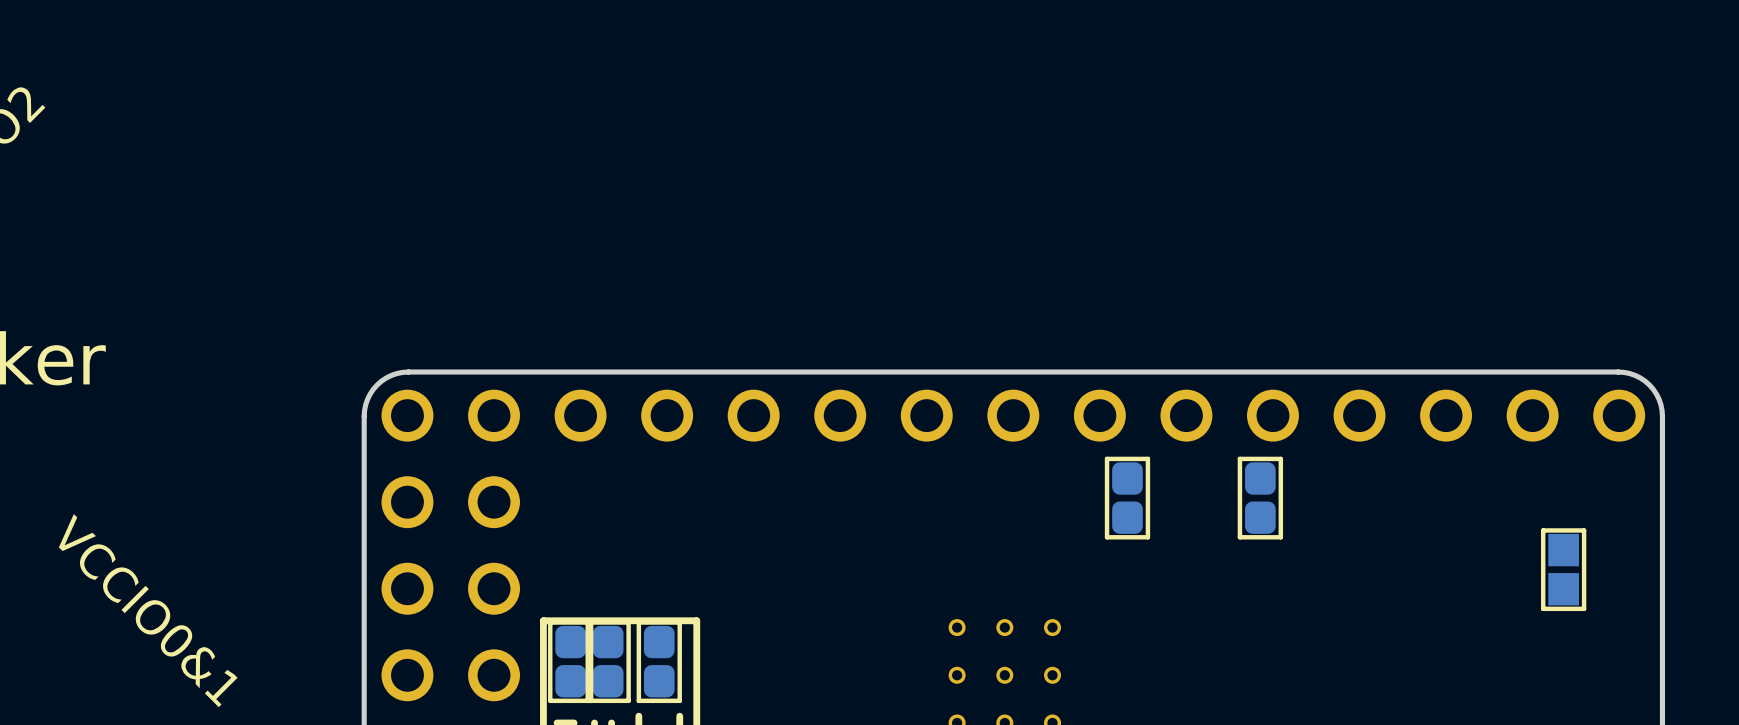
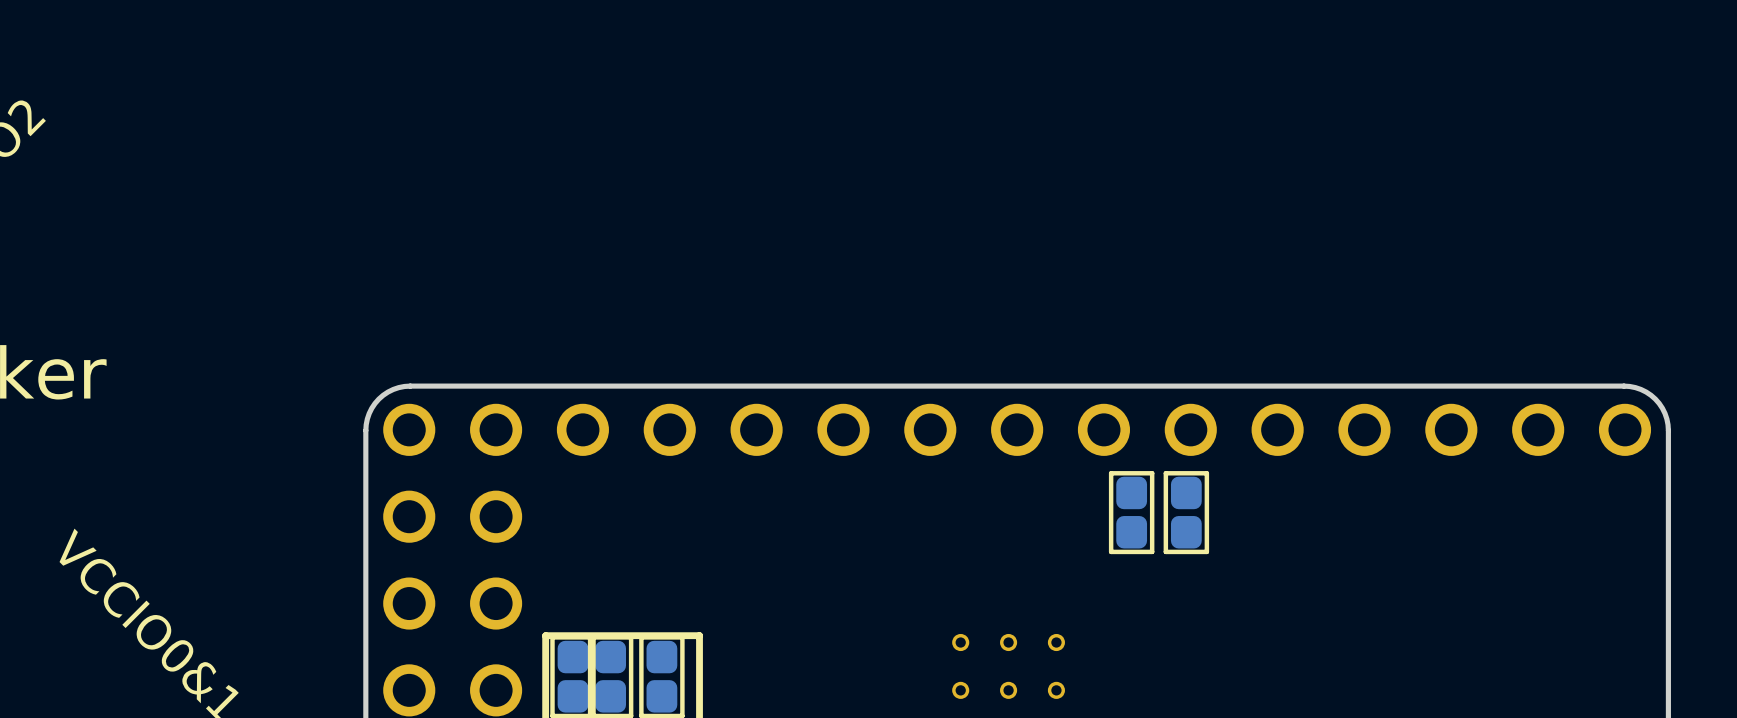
part position: (1260, 498) -> (1186, 512)
part: (1563, 569) -> none

